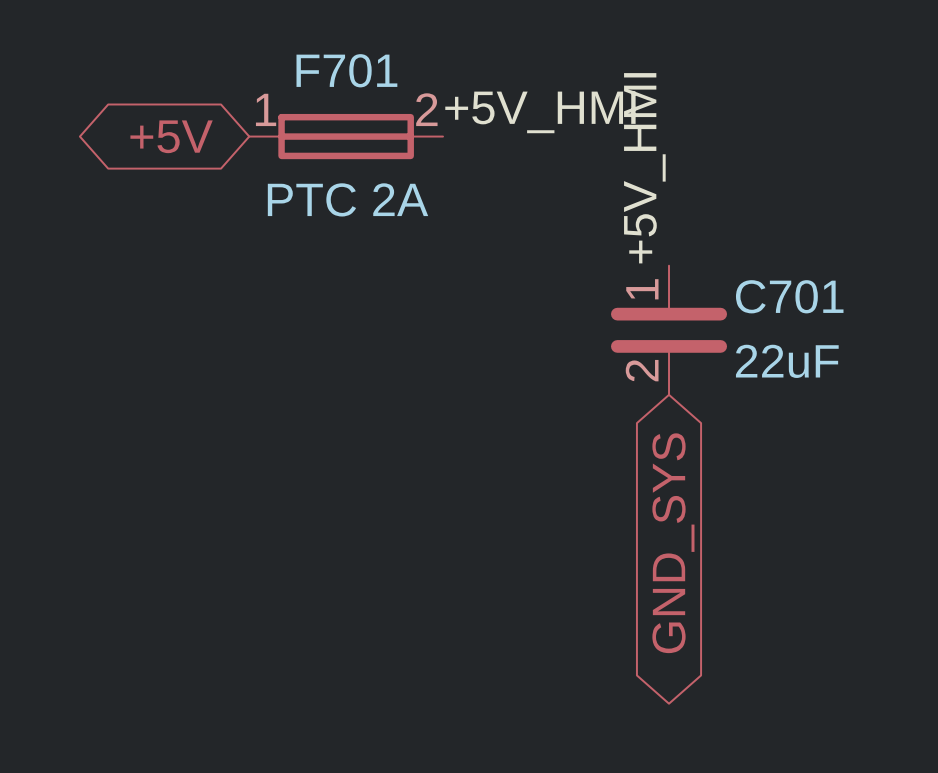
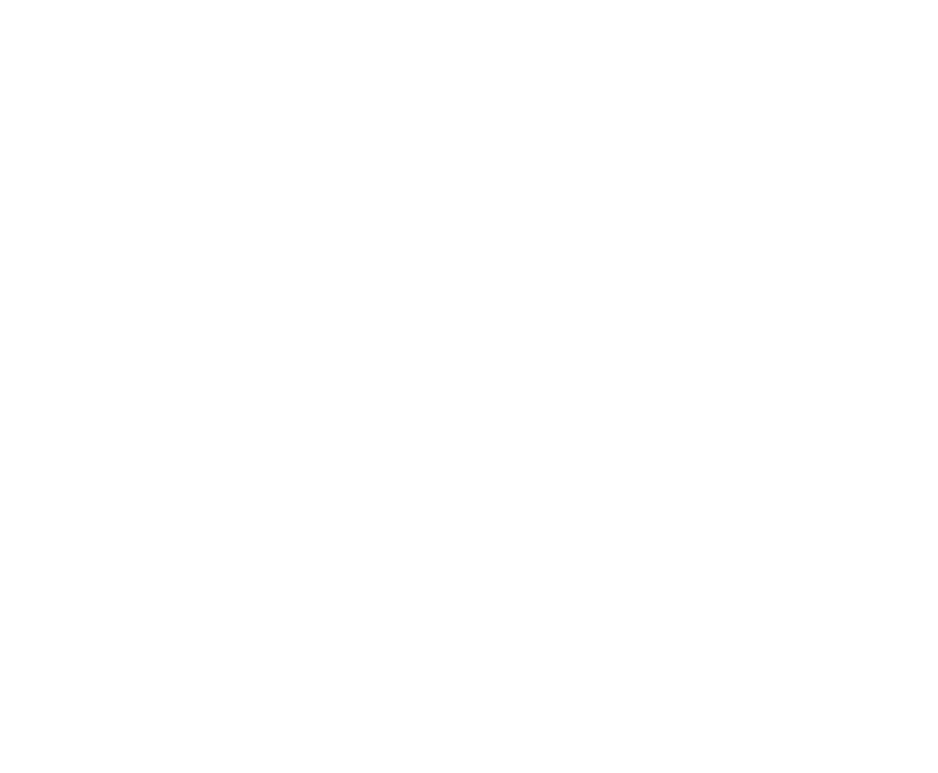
label: +5V_HMI (540, 112) -> none
global label: +5V (171, 136) -> none
F701: PTC 2A (346, 136) -> none
label: +5V_HMI (644, 168) -> none
C701: 22uF (669, 330) -> none
global label: GND_SYS (673, 543) -> none

